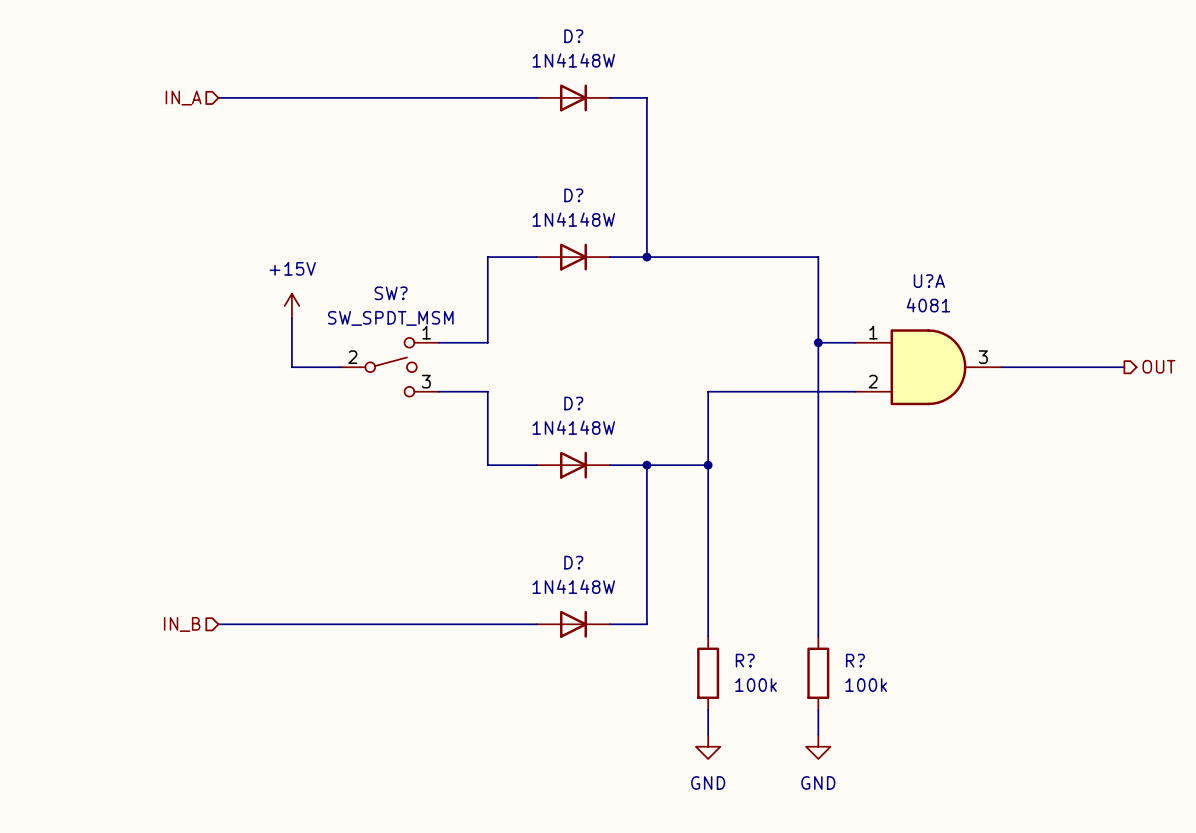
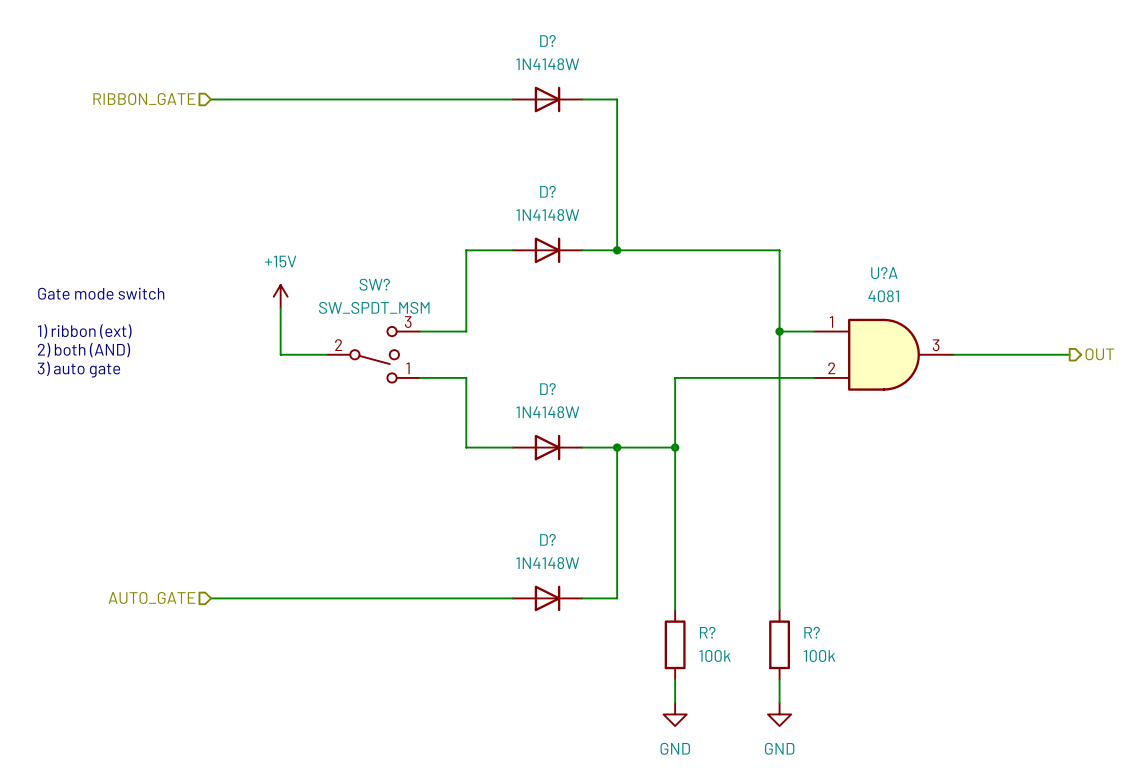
hierarchical label: IN_A (183, 98) -> RIBBON_GATE (144, 99)
text: none -> Gate mode switch (101, 293)
text: none -> 1) ribbon (ext) (84, 331)
text: none -> 2) both (AND) (84, 350)
SW? flip: as is (391, 367) -> up-down (374, 354)
text: none -> 3) auto gate (78, 369)
hierarchical label: IN_B (182, 624) -> AUTO_GATE (151, 597)

